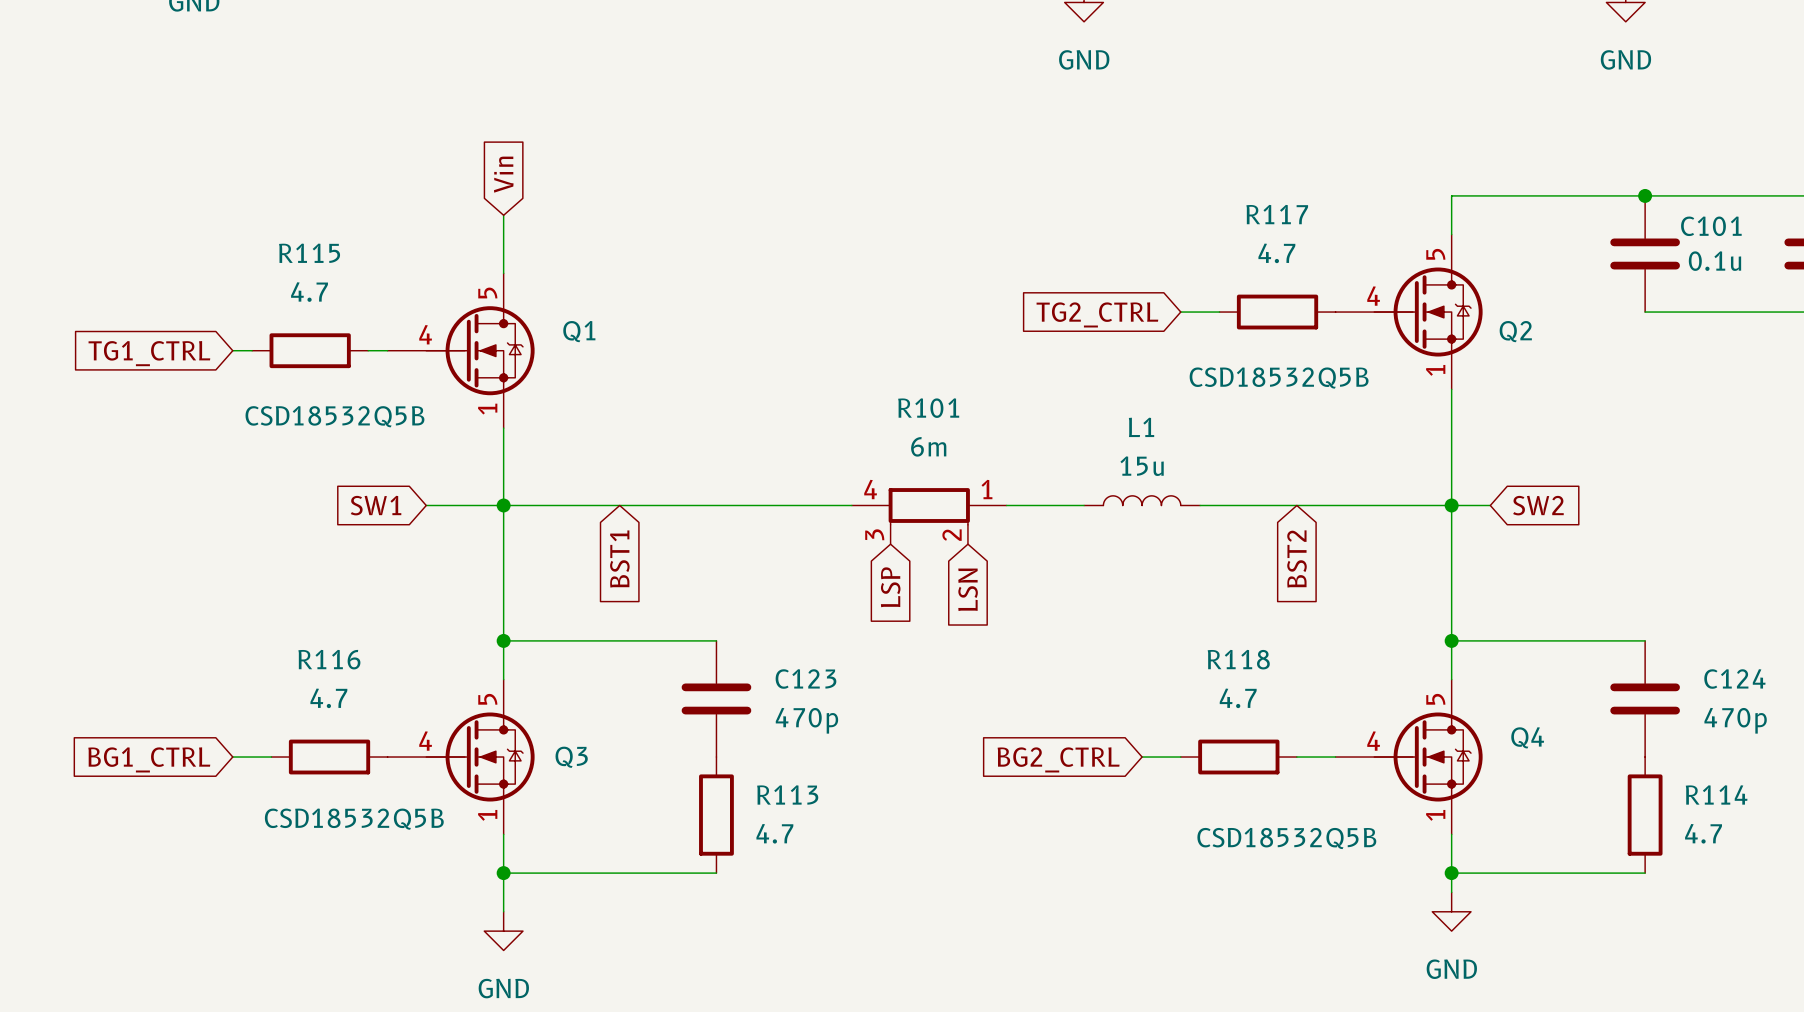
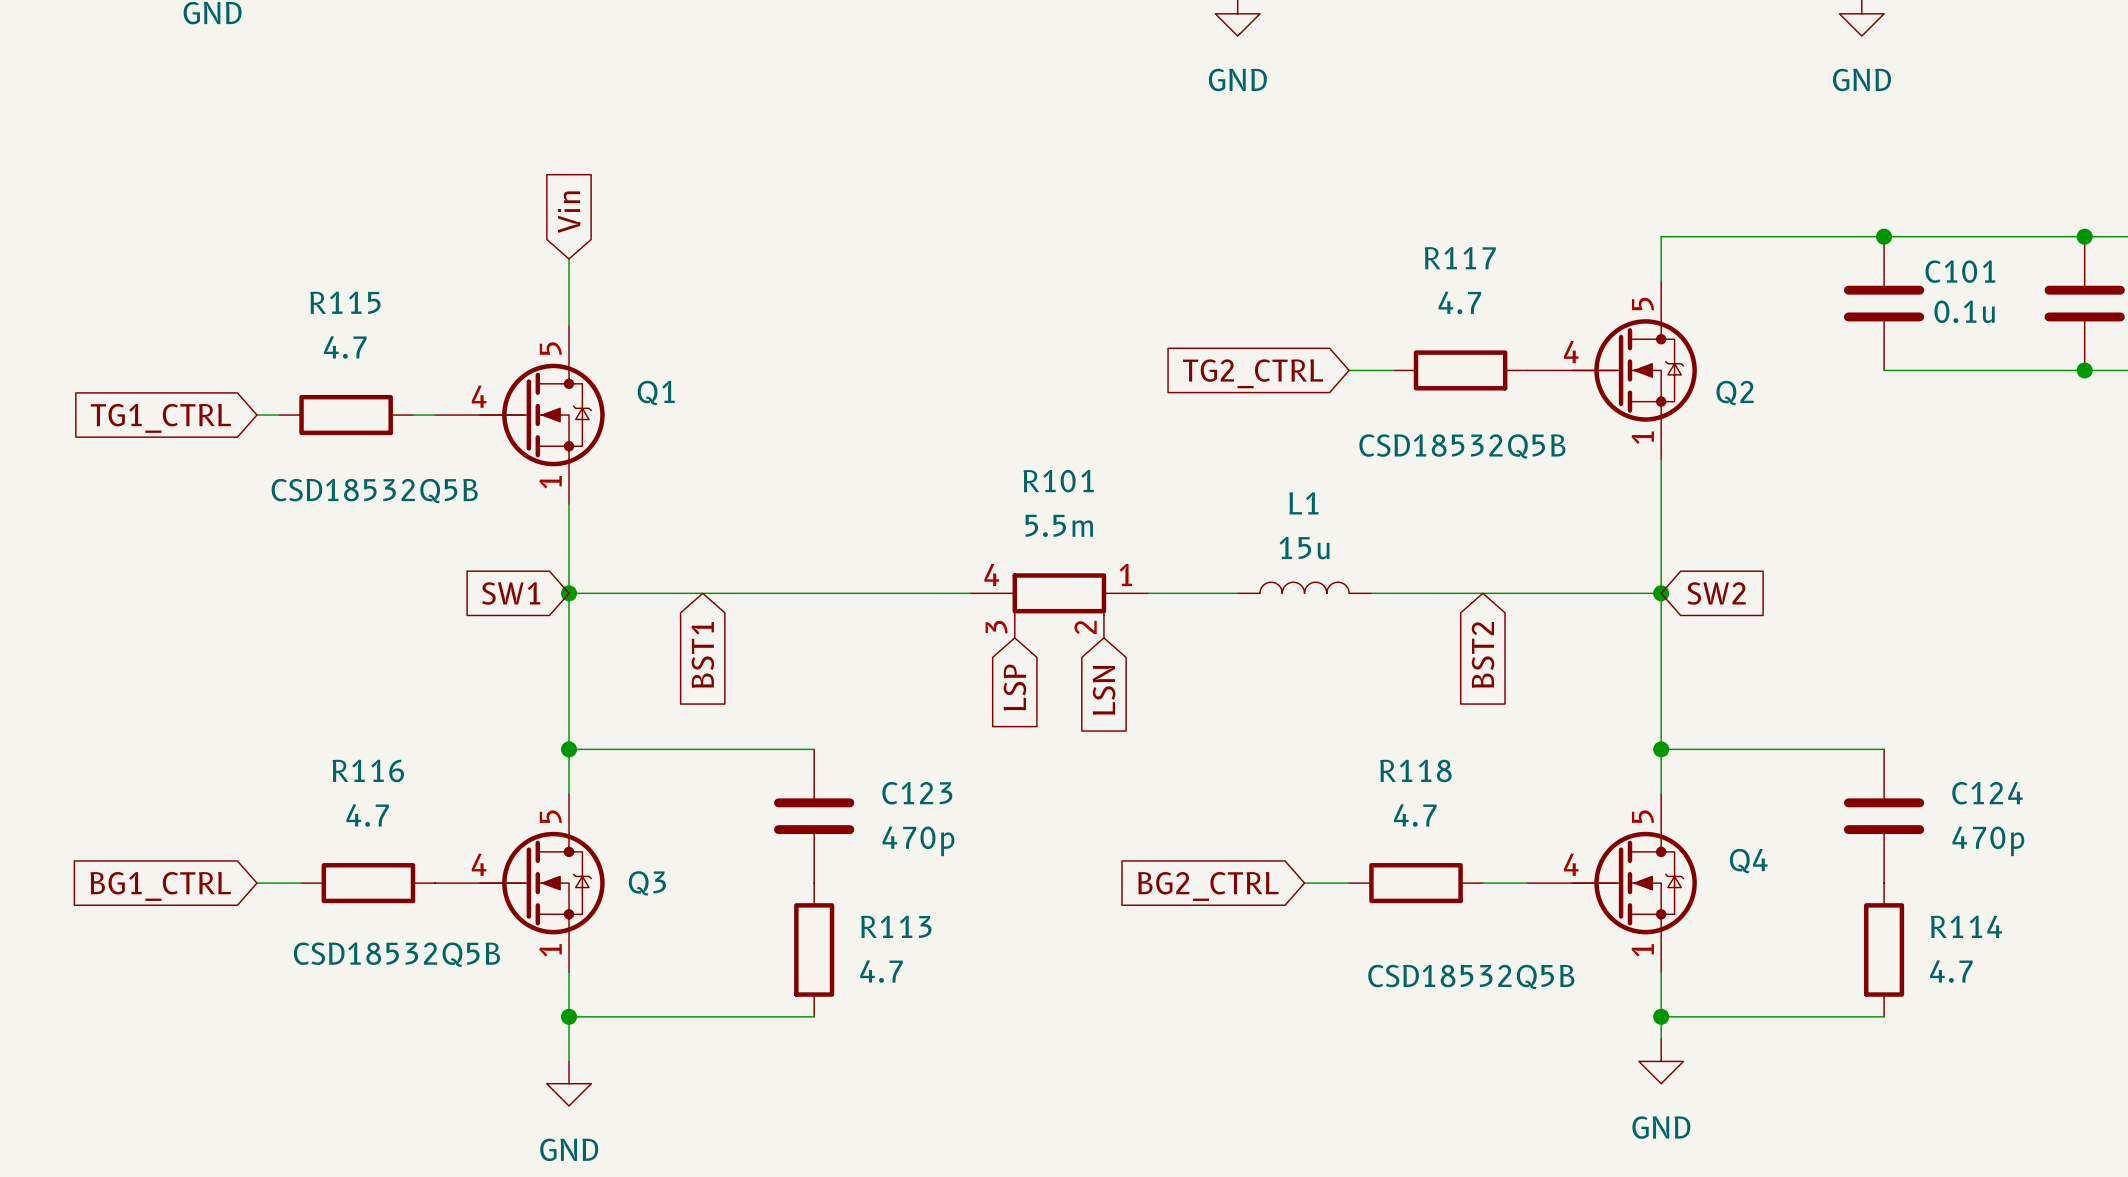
R101 value: 6m (928, 446) -> 5.5m (1059, 525)
global label position: SW1 (376, 505) -> SW1 (511, 593)
wire: (426, 505) (503, 505) -> none
wire: (1451, 505) (1490, 505) -> none
global label position: SW2 (1538, 505) -> SW2 (1716, 593)

